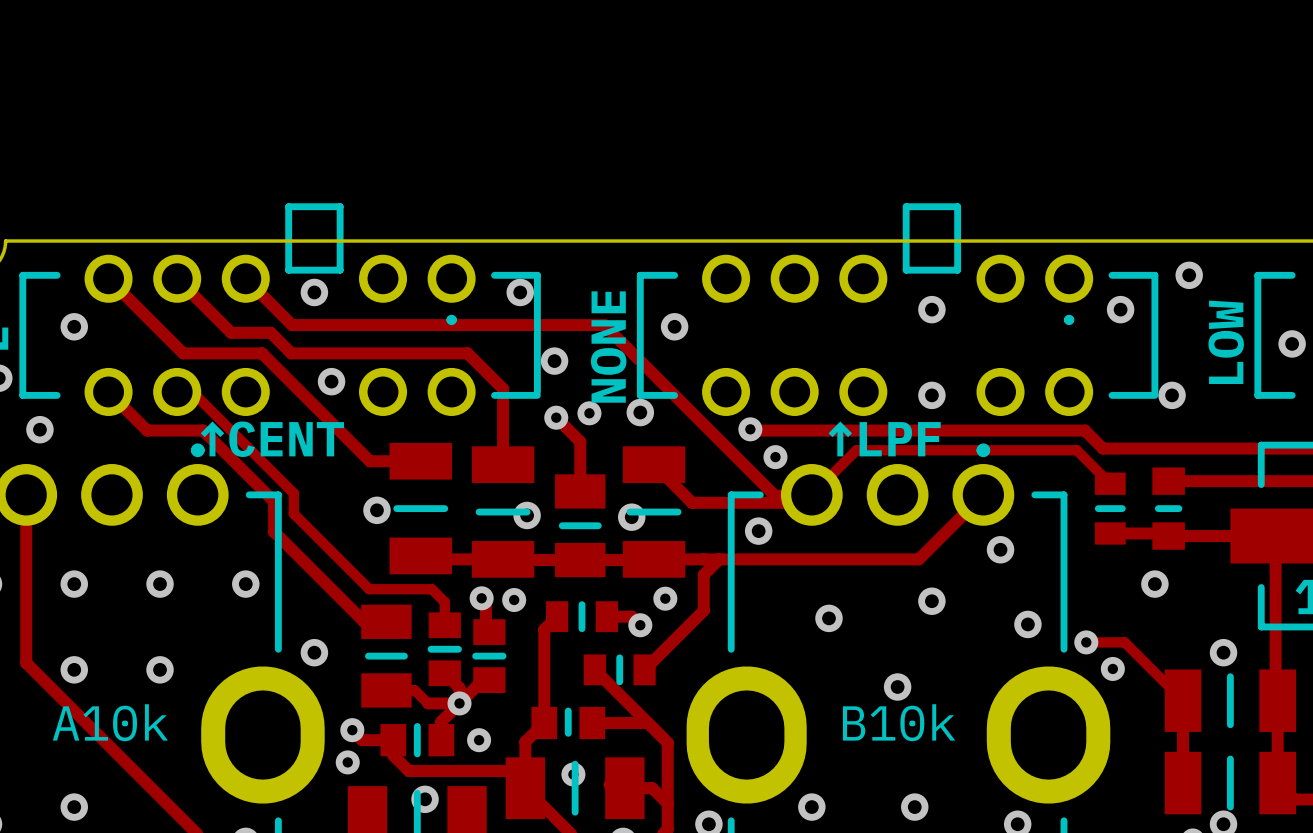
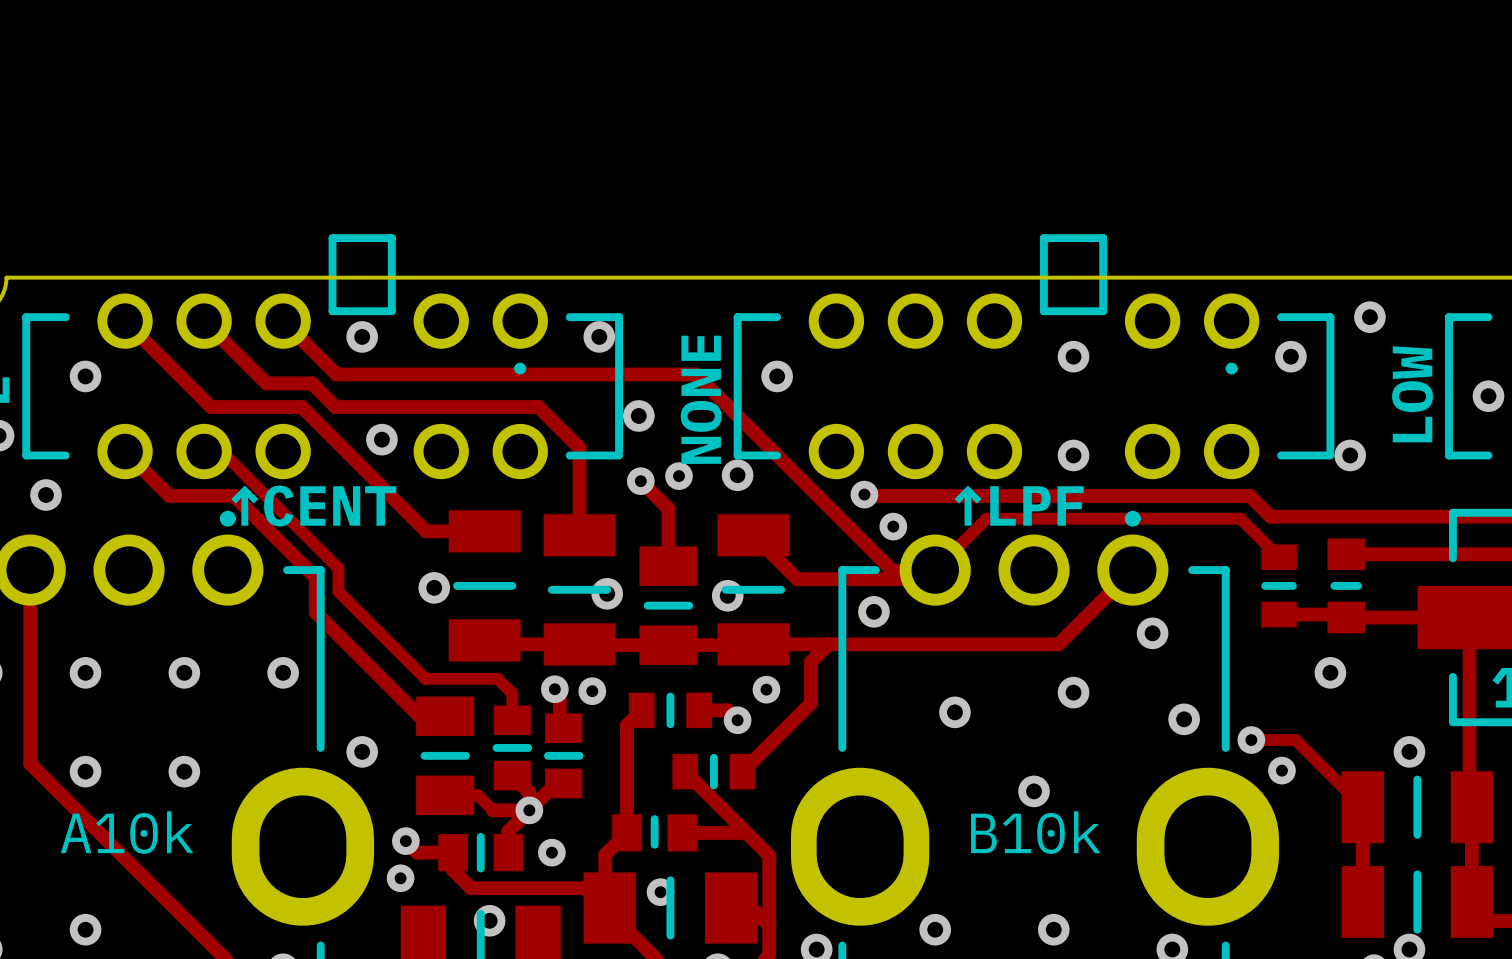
part footprint: [505, 757, 645, 820] -> [583, 872, 758, 944]

